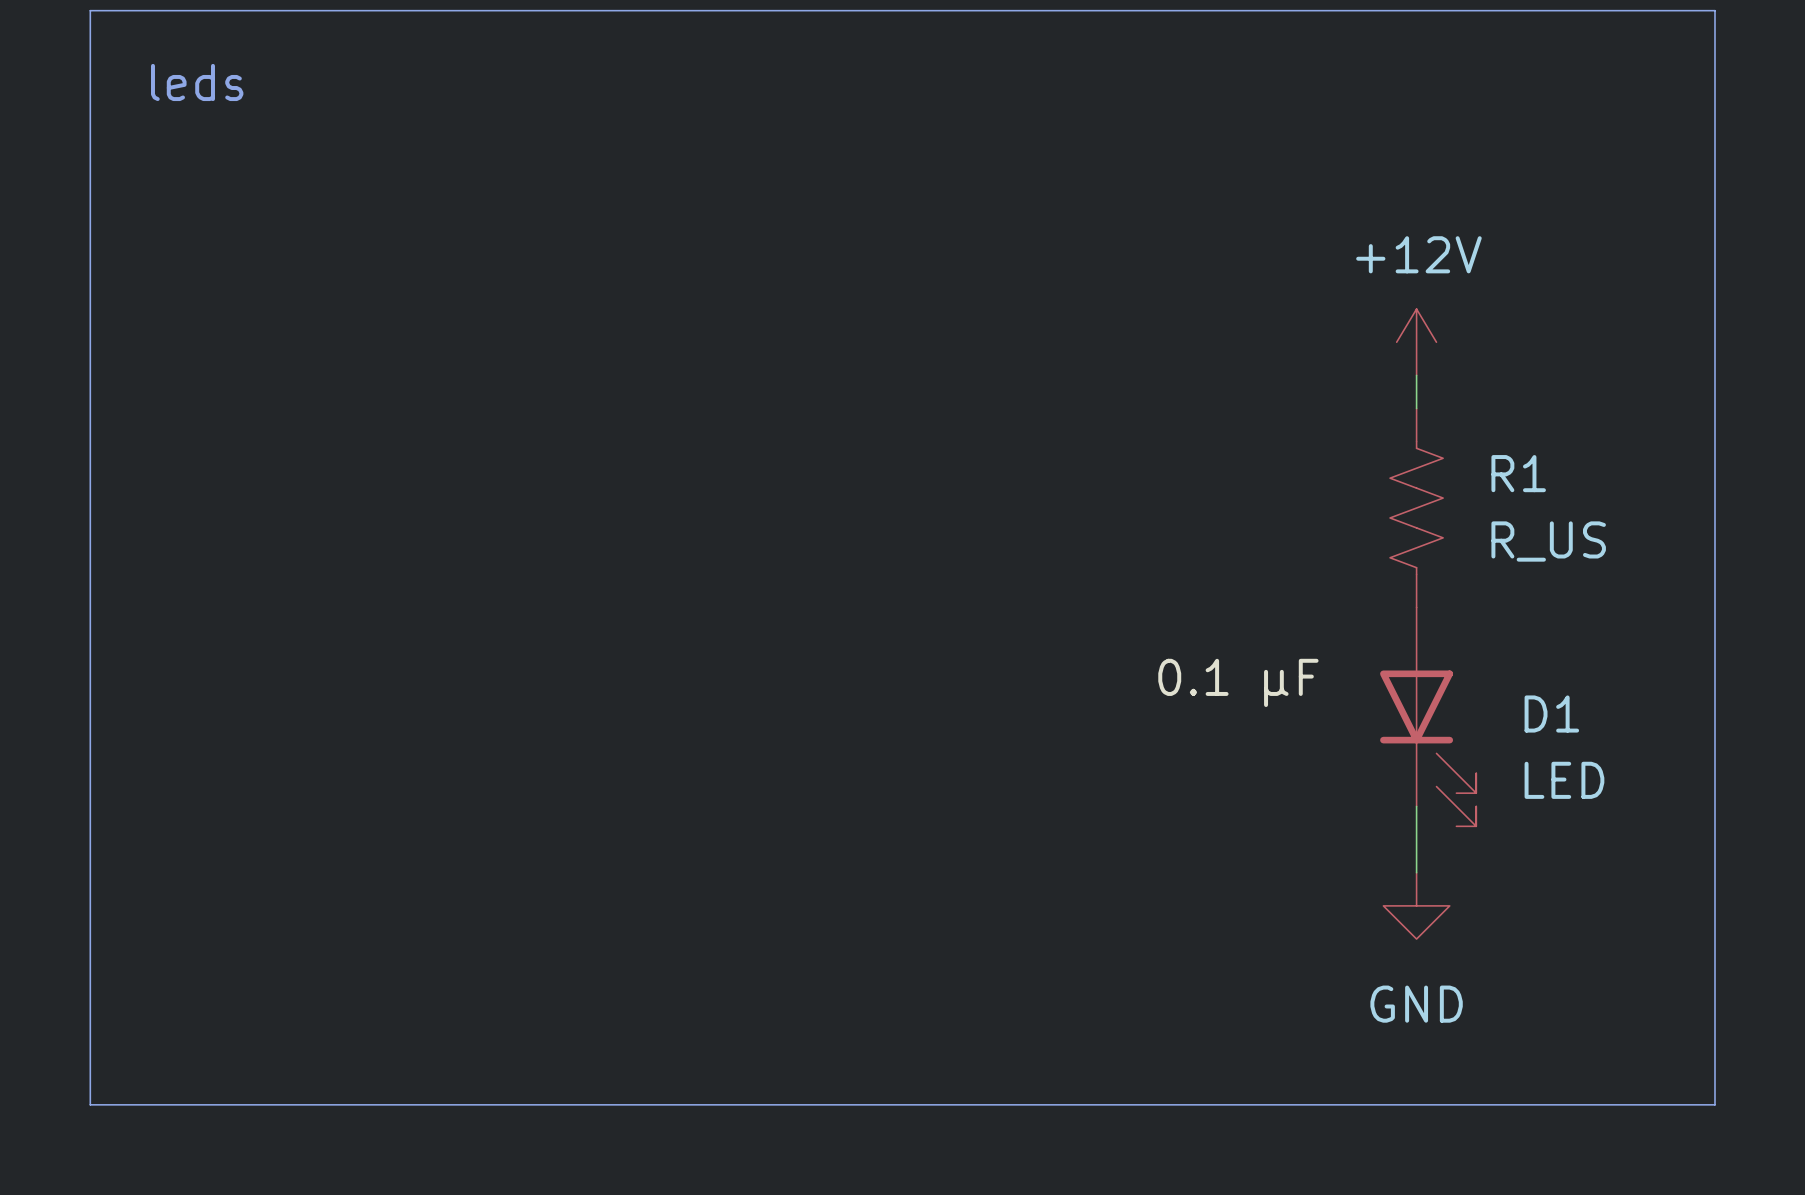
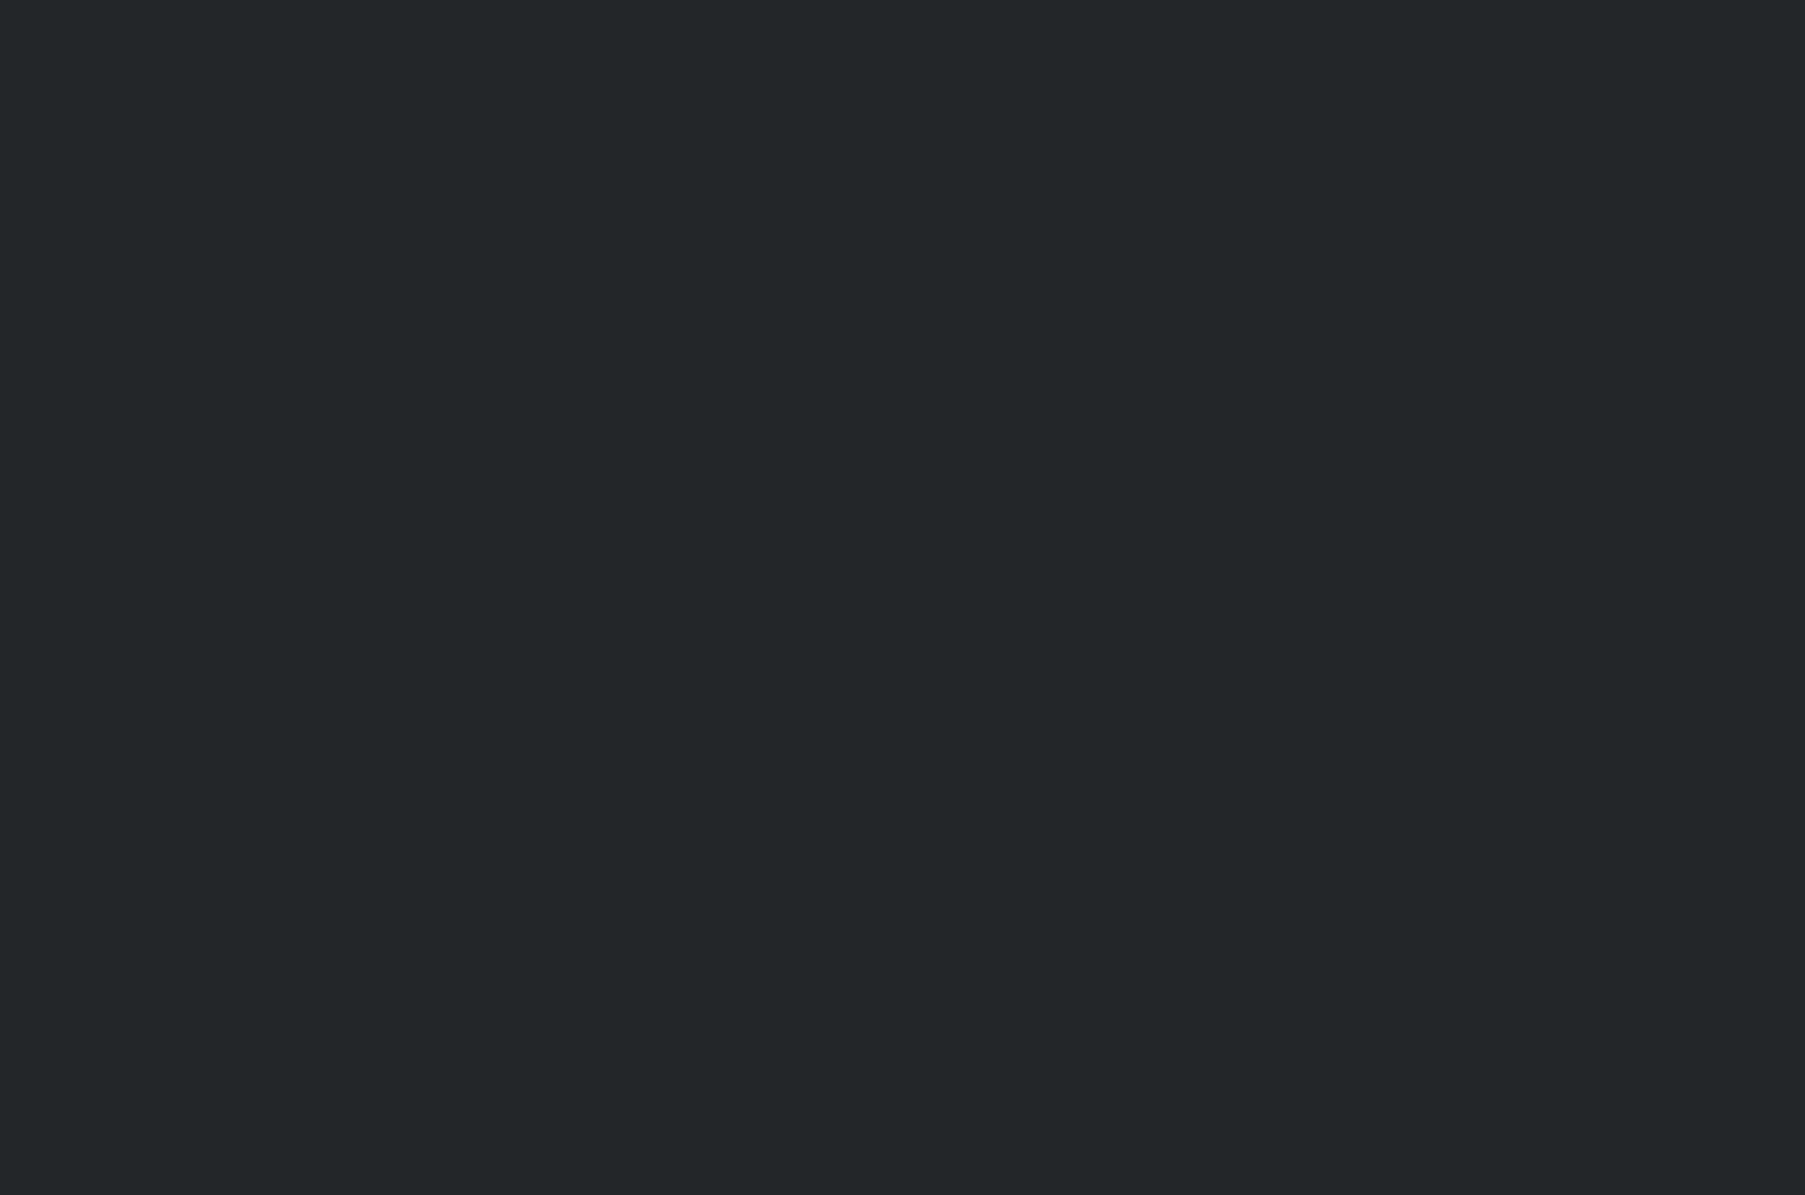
line: (90, 10) (1714, 10) (1714, 1104) (90, 1104) (90, 10) -> none
text: leds (197, 82) -> none
power symbol: +12V (1416, 342) -> none
wire: (1416, 375) (1416, 408) -> none
R1: R_US (1416, 508) -> none
label: 0.1 µF (1238, 682) -> none
D1: LED (1428, 716) -> none
wire: (1416, 806) (1416, 872) -> none
power symbol: GND (1416, 905) -> none

